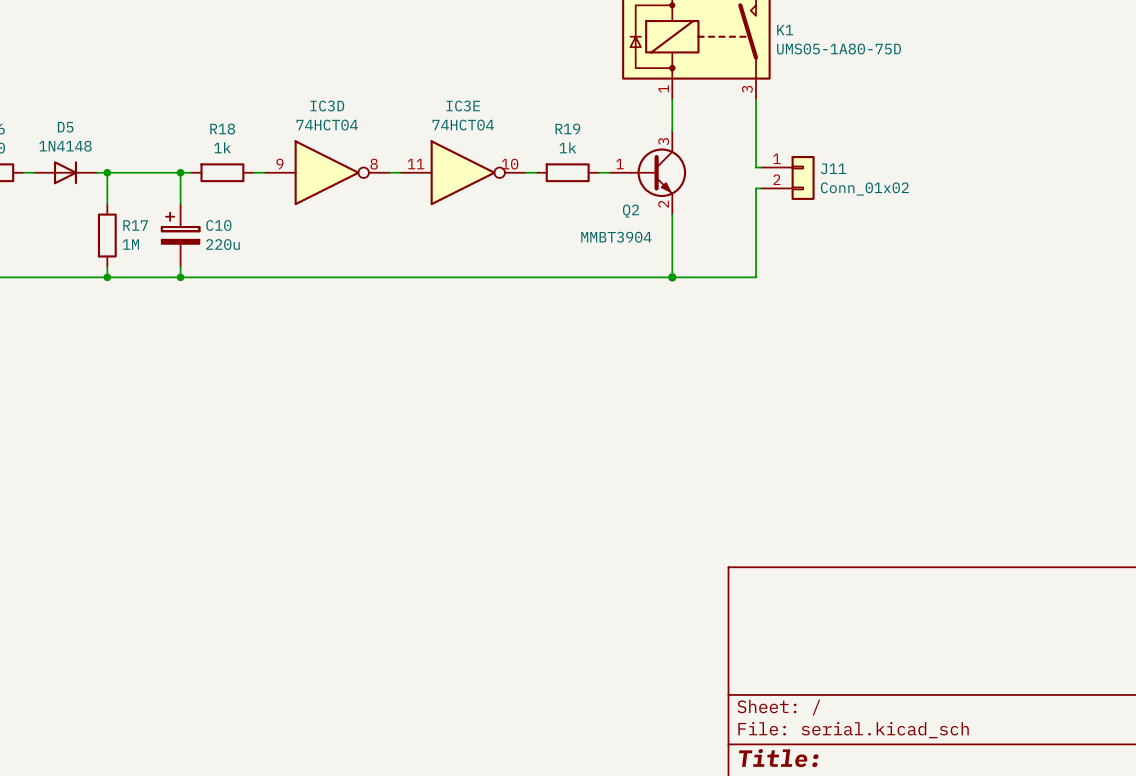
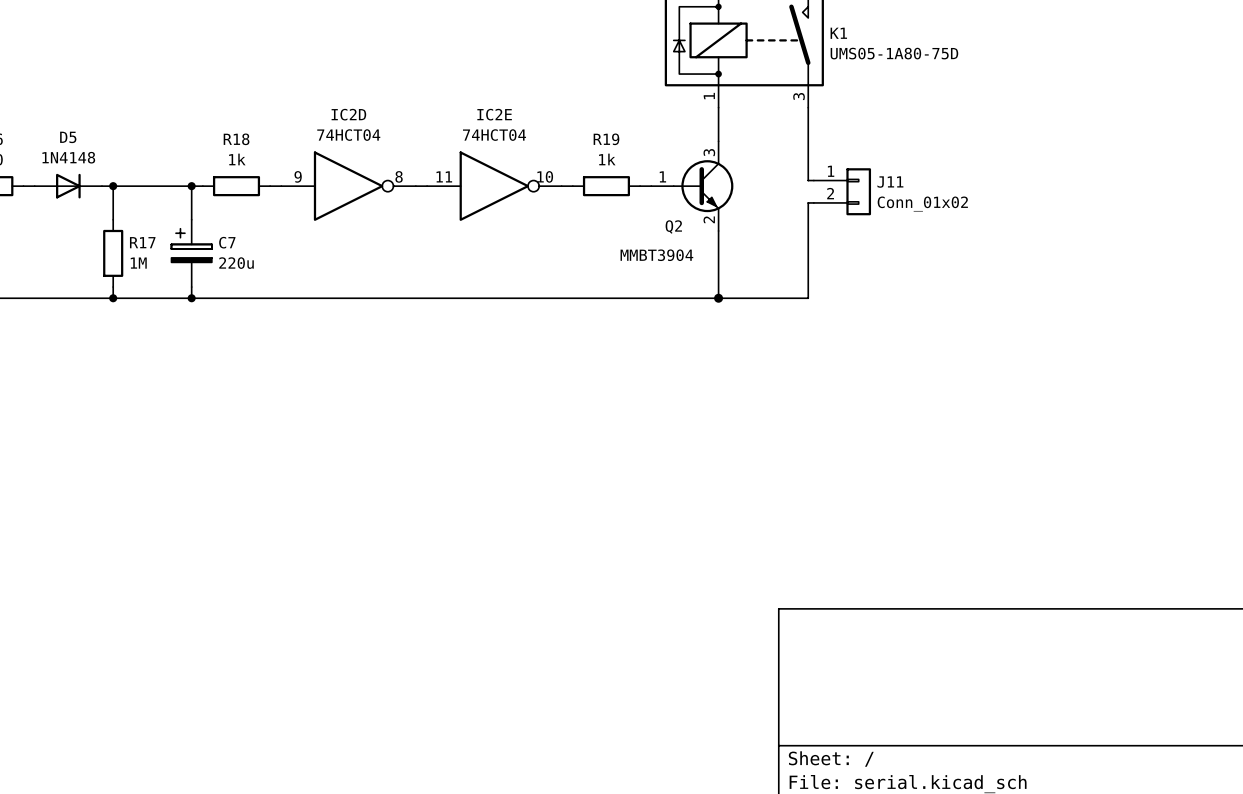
IC3D name: IC3D (327, 106) -> IC2D (348, 114)
IC3E name: IC3E (463, 106) -> IC2E (494, 114)
C10 name: C10 (218, 225) -> C7 (227, 242)

